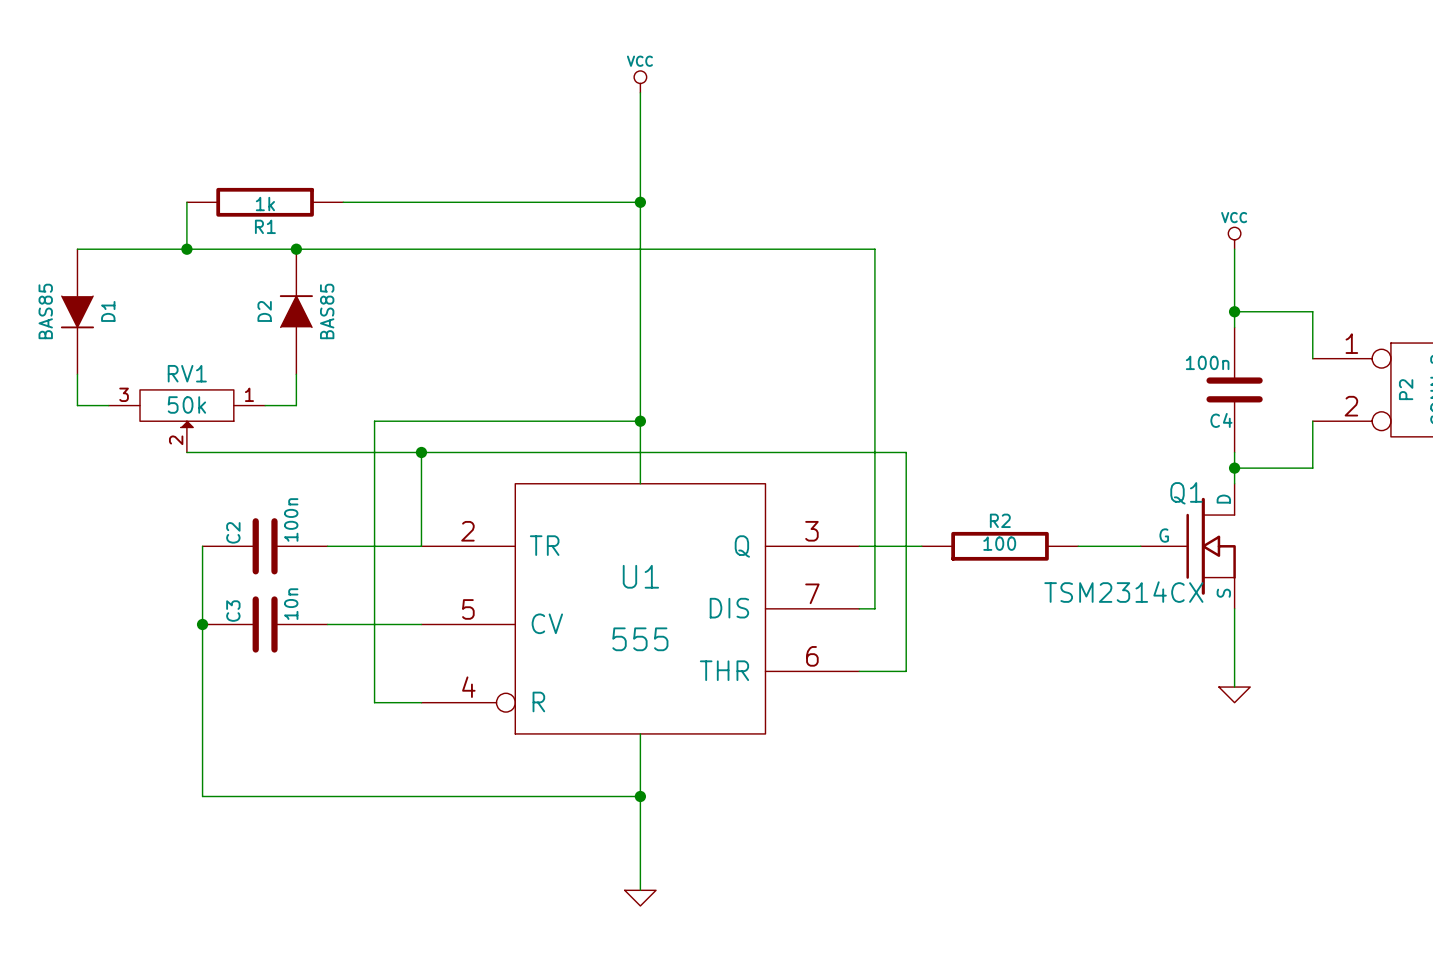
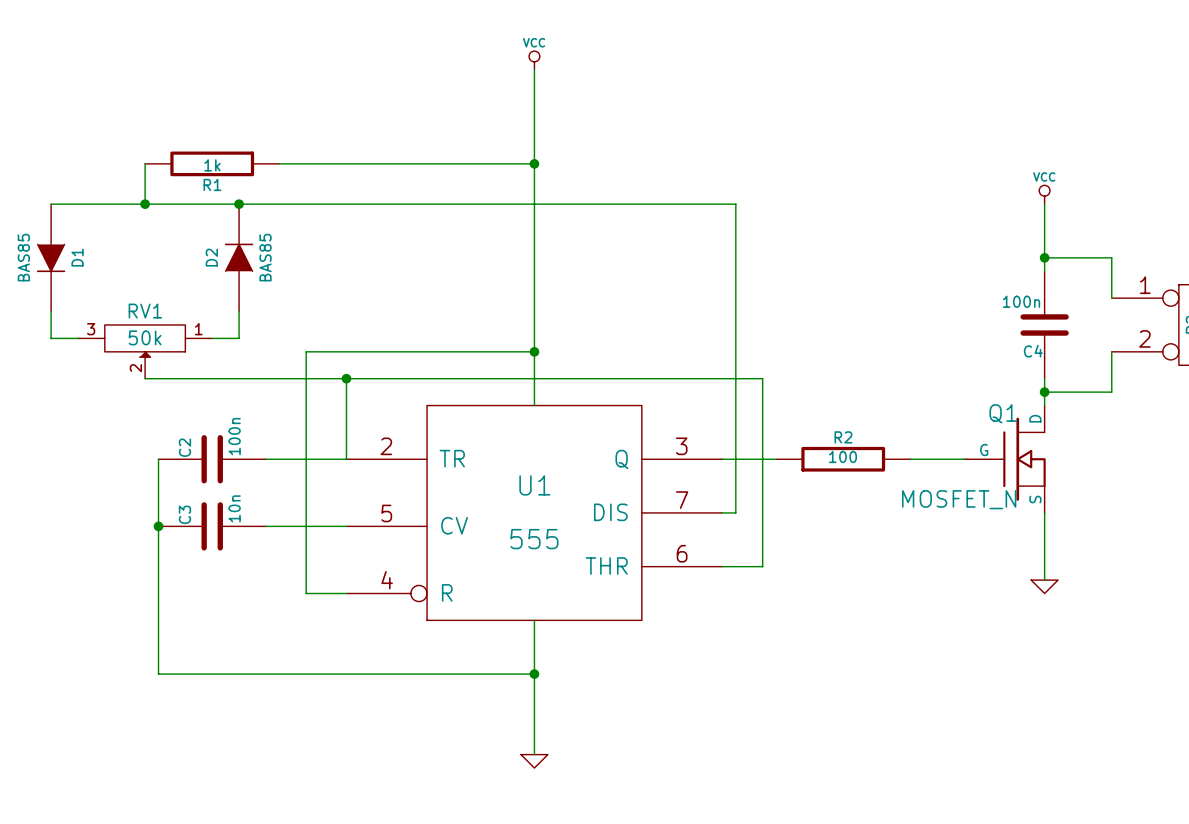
Q1 value: TSM2314CX (1123, 592) -> MOSFET_N (959, 499)

